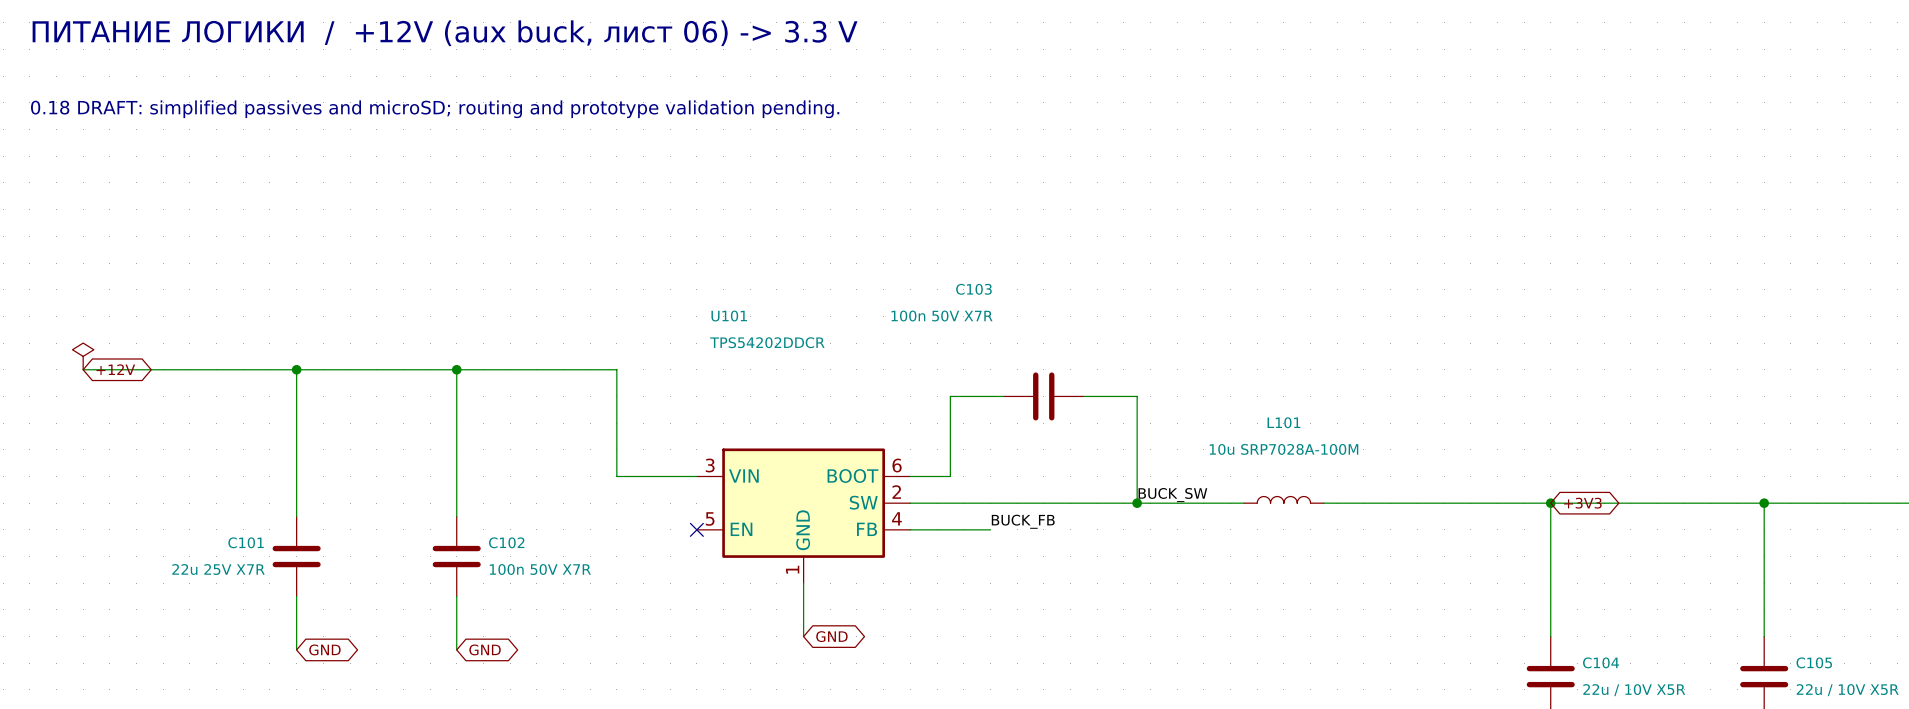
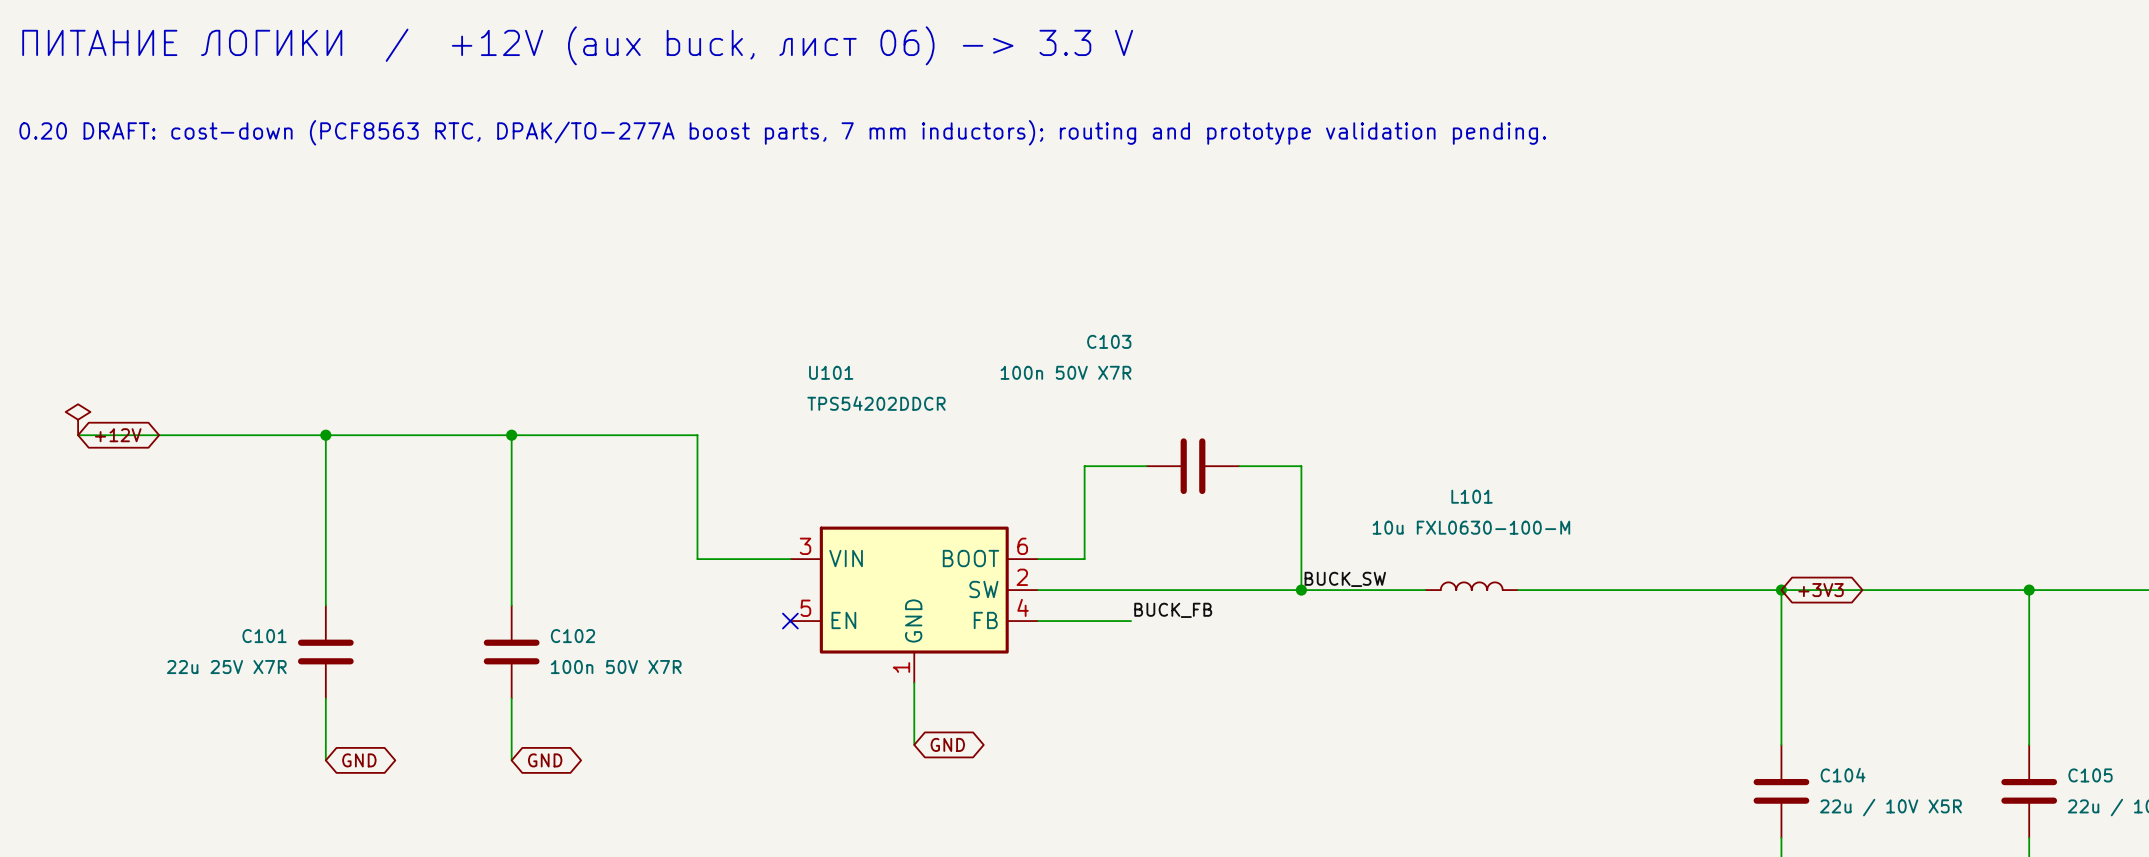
text: 0.18 DRAFT: simplified passives and microSD; routing and prototype validation pending. (435, 109) -> 0.20 DRAFT: cost-down (PCF8563 RTC, DPAK/TO-277A boost parts, 7 mm inductors); routing and prototype validation pending. (782, 132)
L101 value: 10u SRP7028A-100M (1283, 449) -> 10u FXL0630-100-M (1471, 527)

